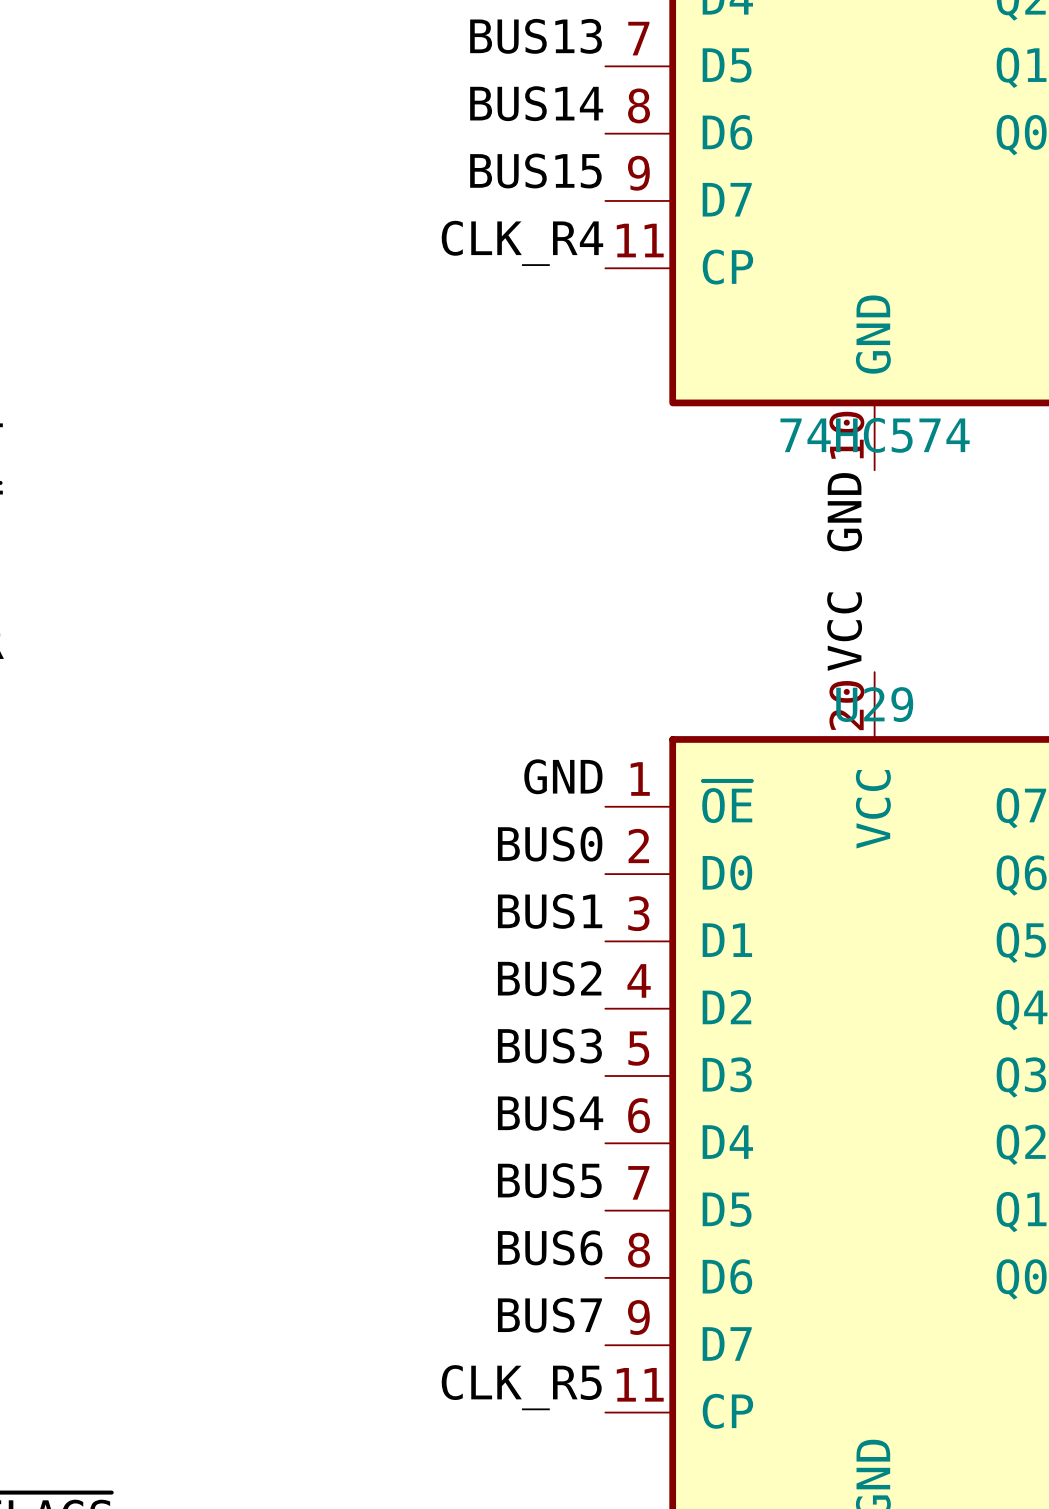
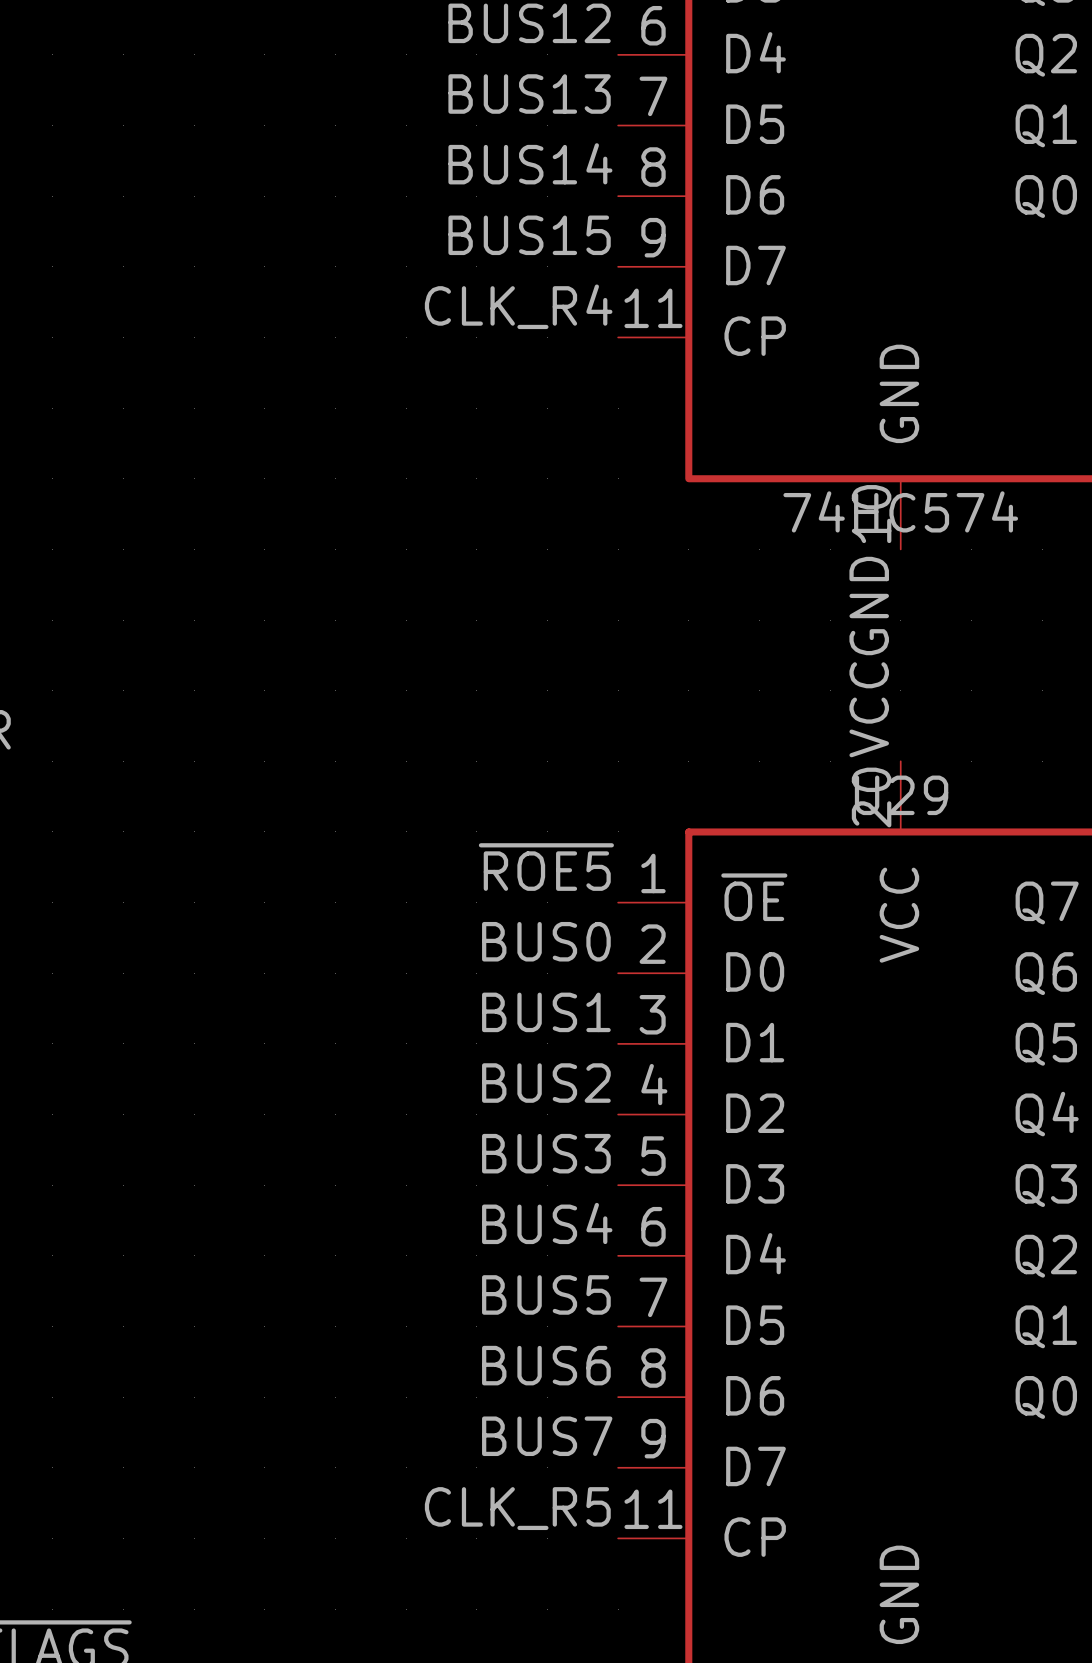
label: GND (563, 776) -> ~{ROE5} (546, 867)

